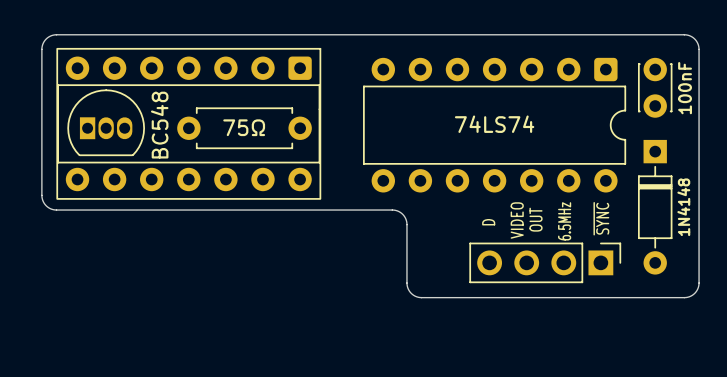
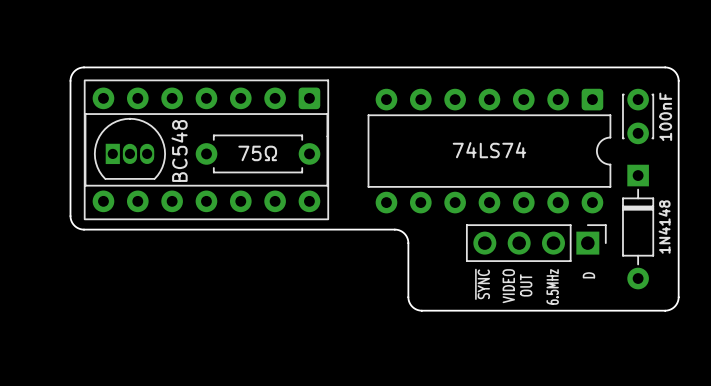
text position: ~{SYNC} (601, 218) -> ~{SYNC} (482, 284)
text position: OUT (536, 219) -> OUT (526, 285)
text position: VIDEO (517, 220) -> VIDEO (508, 286)
text position: 6.5MHz (564, 221) -> 6.5MHz (552, 286)
text position: D (488, 222) -> D (588, 275)
part position: (545, 262) -> (536, 243)

